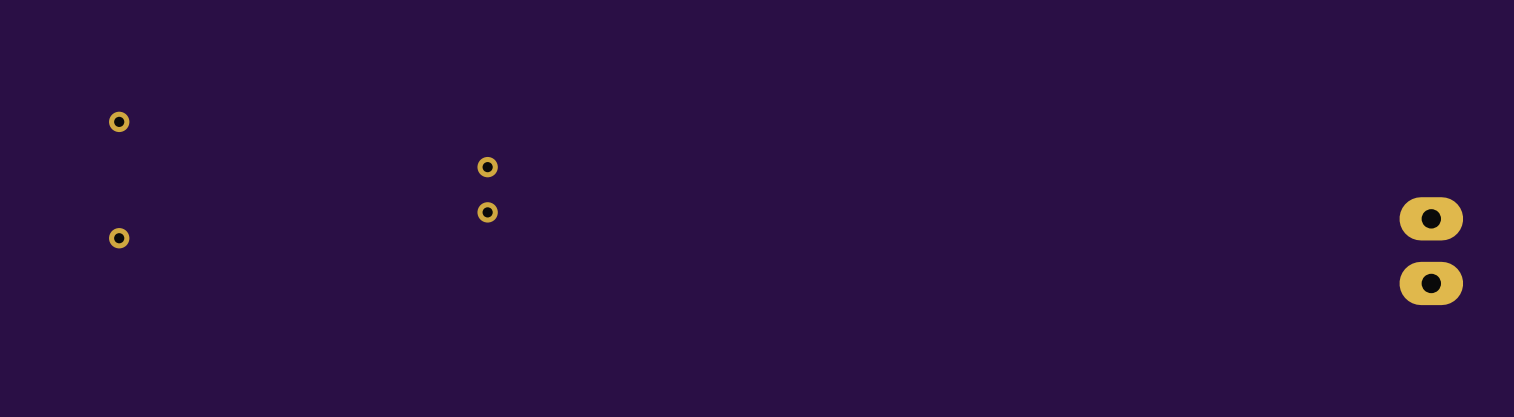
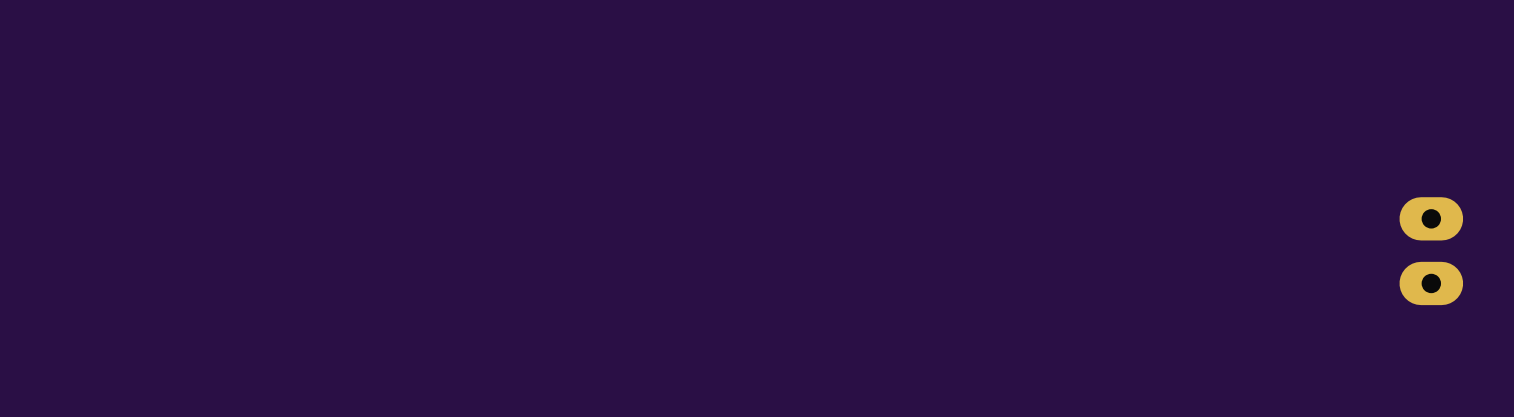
via: (119, 121) -> none
via: (487, 167) -> none
via: (487, 212) -> none
via: (119, 238) -> none

